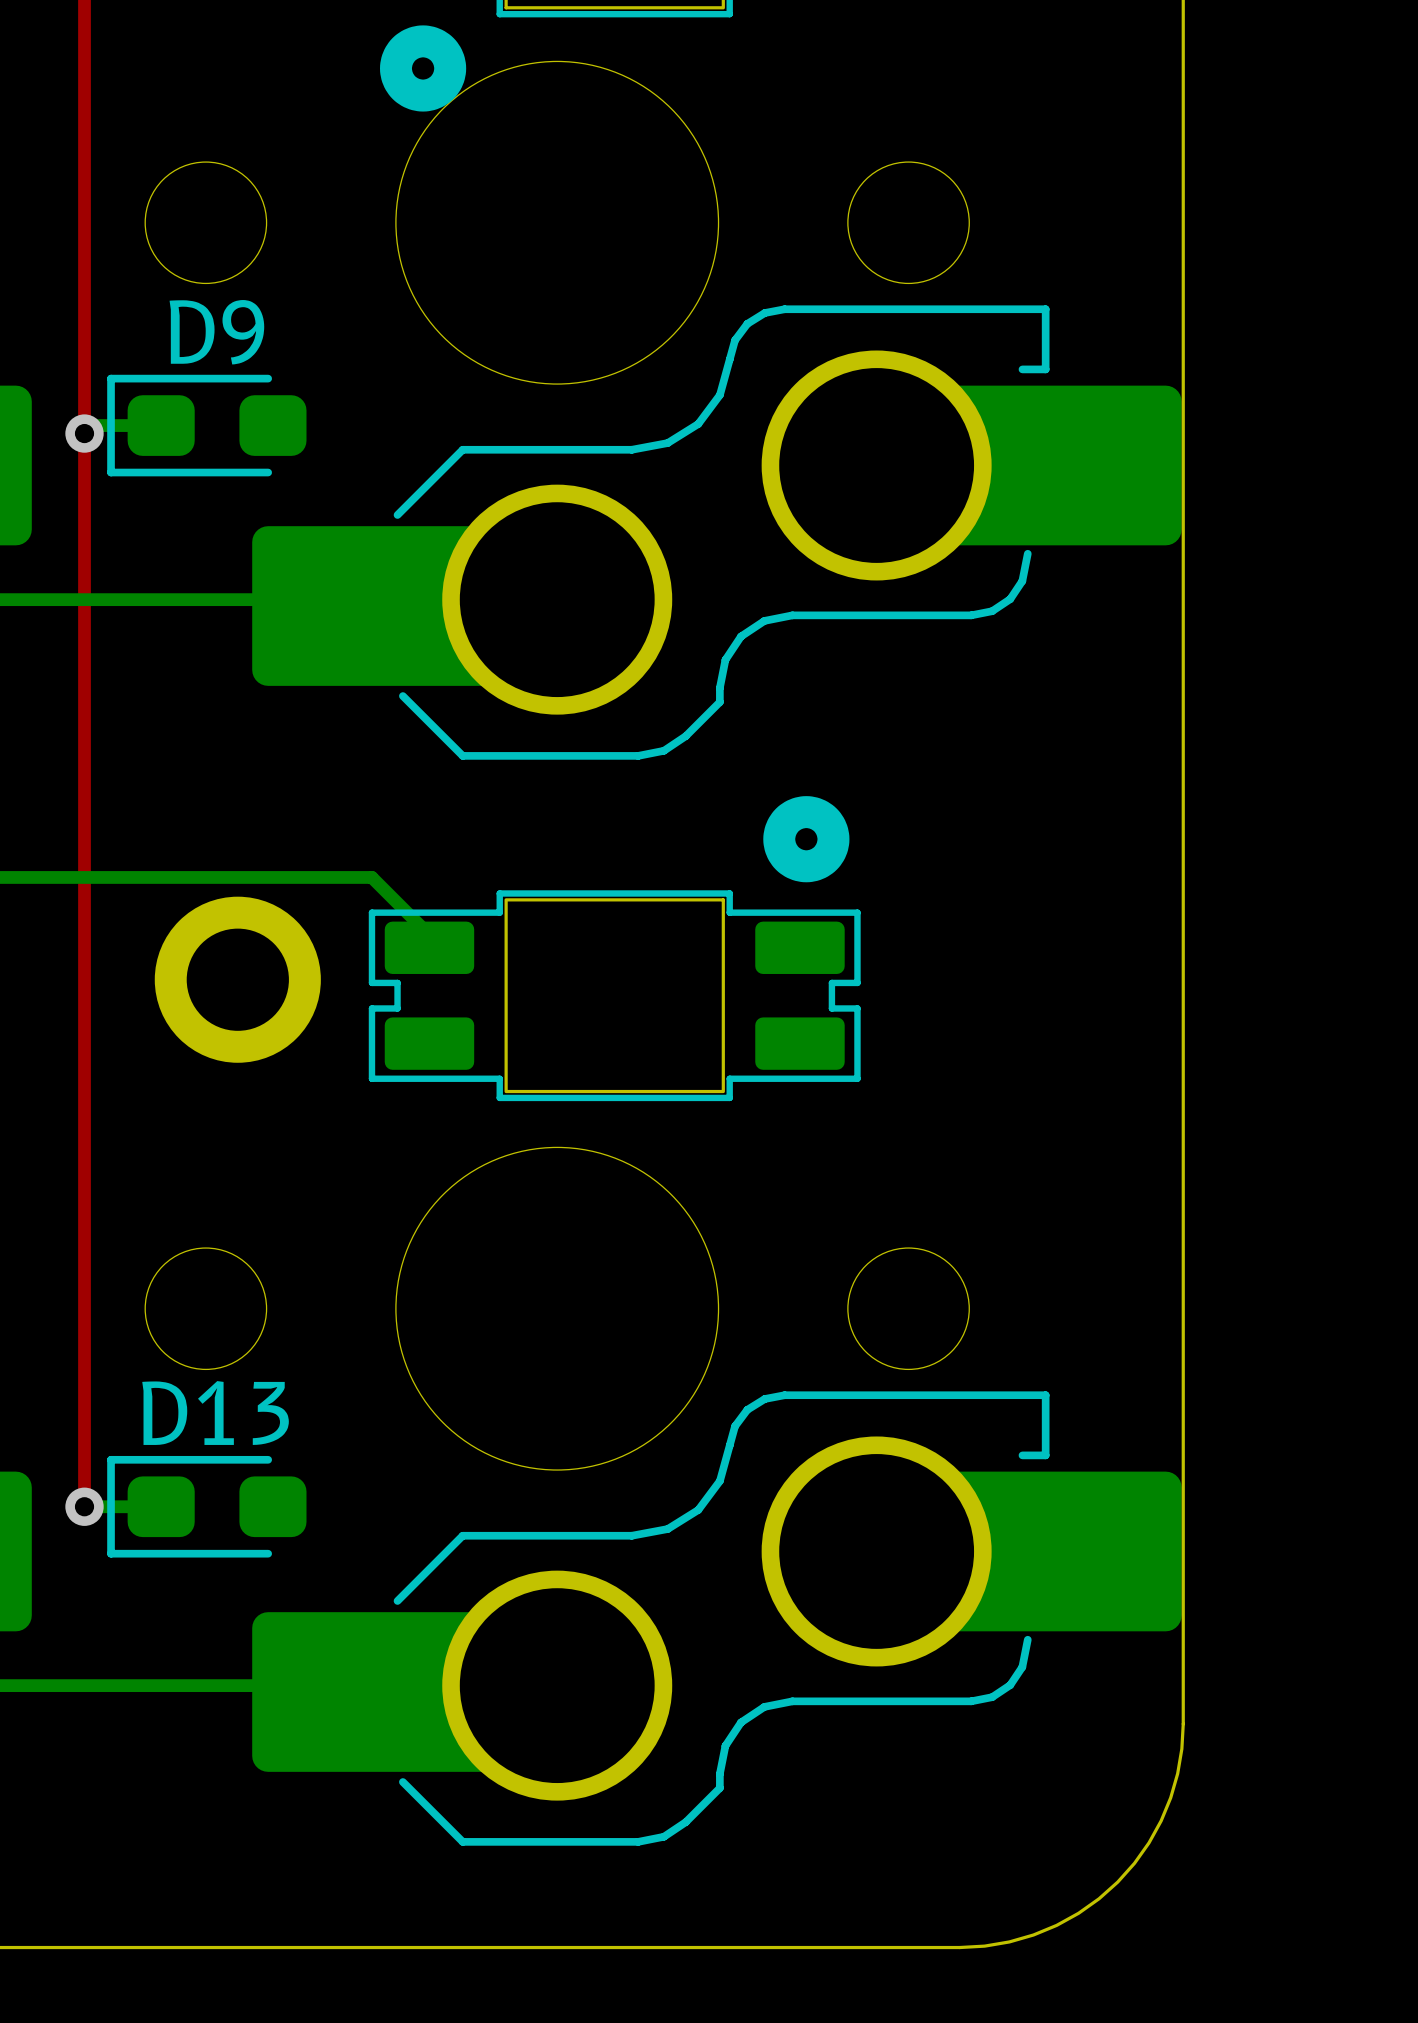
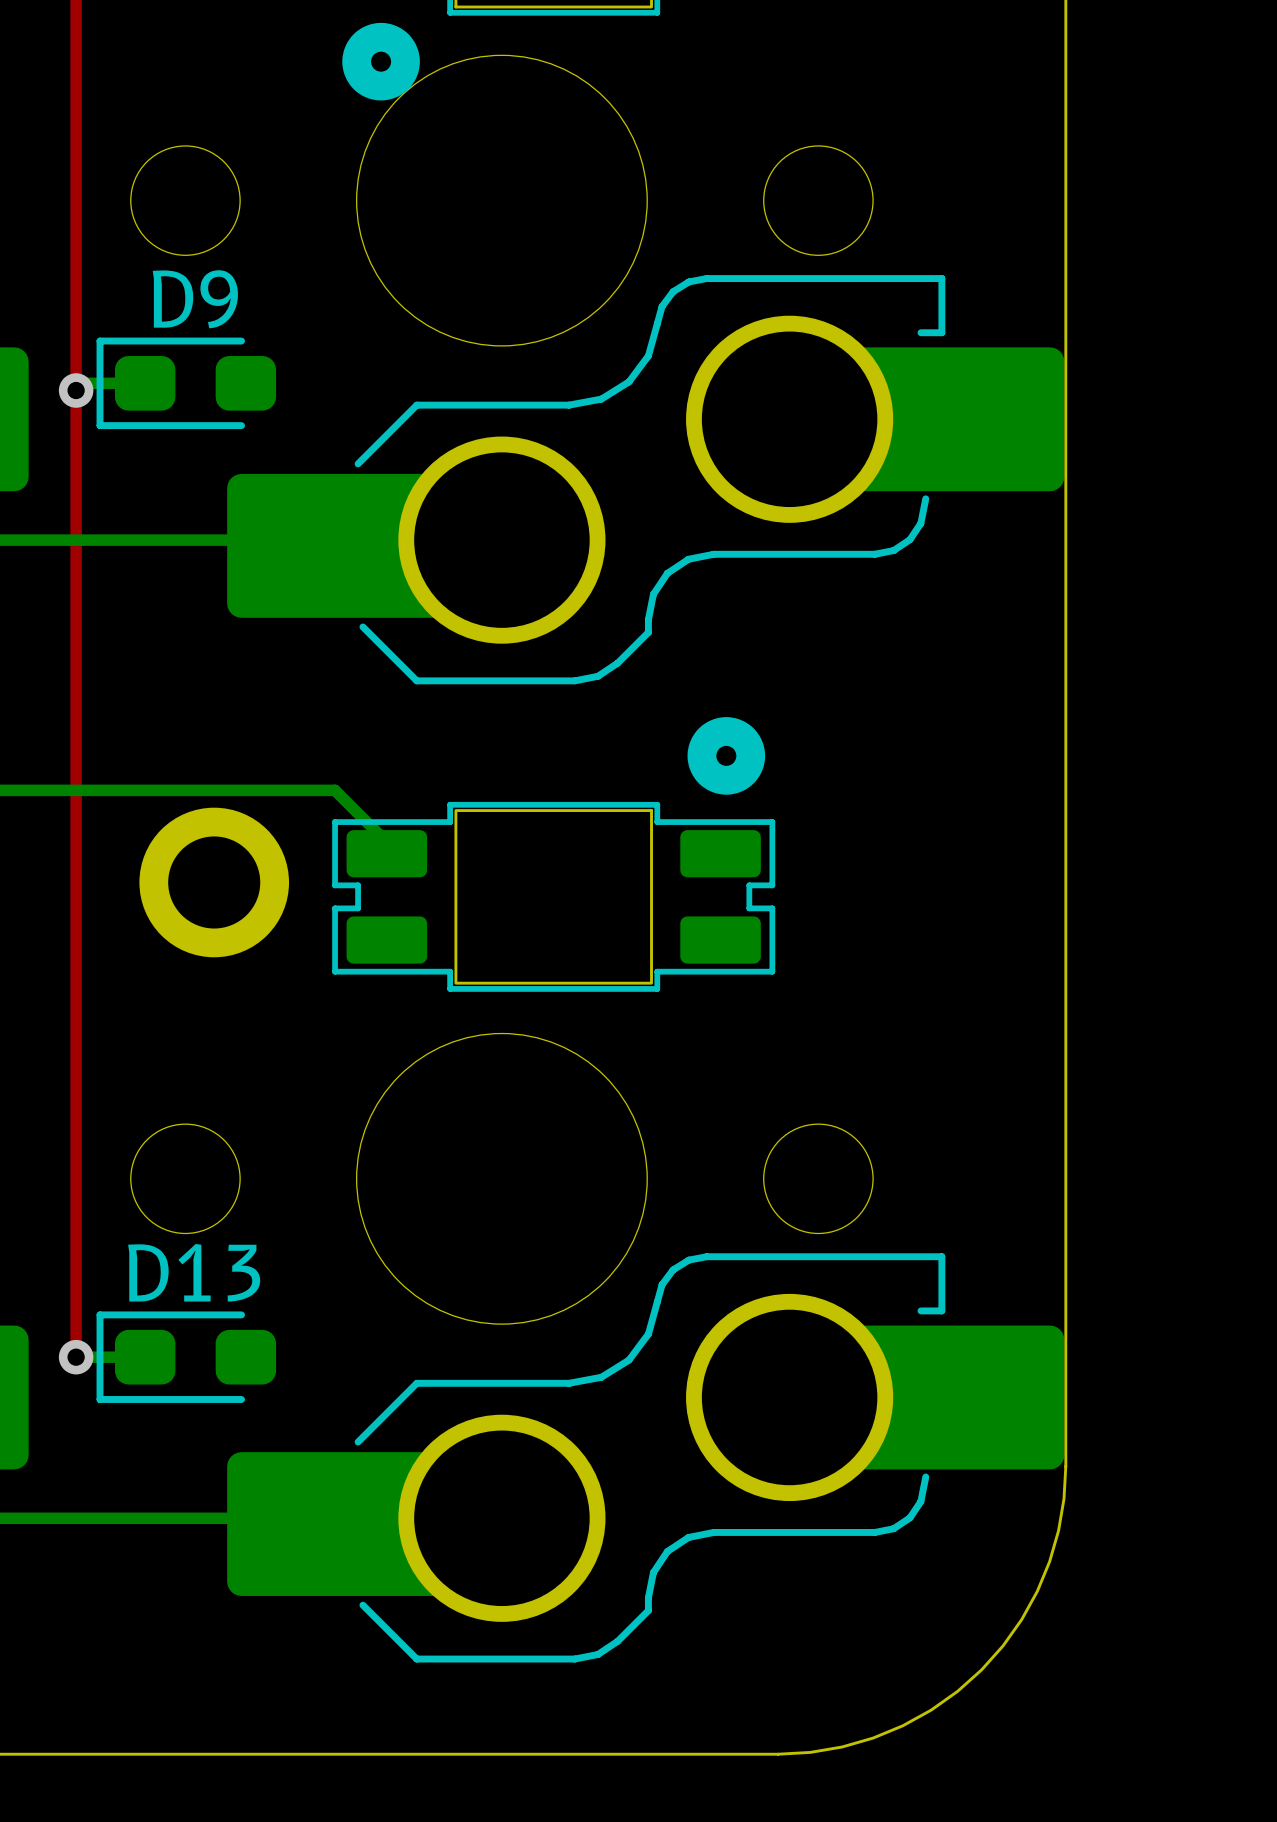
board edge: (1183, 1628) (1183, 1723) (1177, 1773) (1170, 1797) (1148, 1842) (1117, 1882) (1078, 1913) (1033, 1934) (1009, 1941) (959, 1947) (863, 1947) -> (1065, 1466) (1064, 1498) (1058, 1530) (1049, 1561) (1037, 1591) (1021, 1619) (1003, 1645) (981, 1669) (957, 1691) (931, 1710) (902, 1725) (873, 1738) (842, 1747) (810, 1752) (778, 1754)

